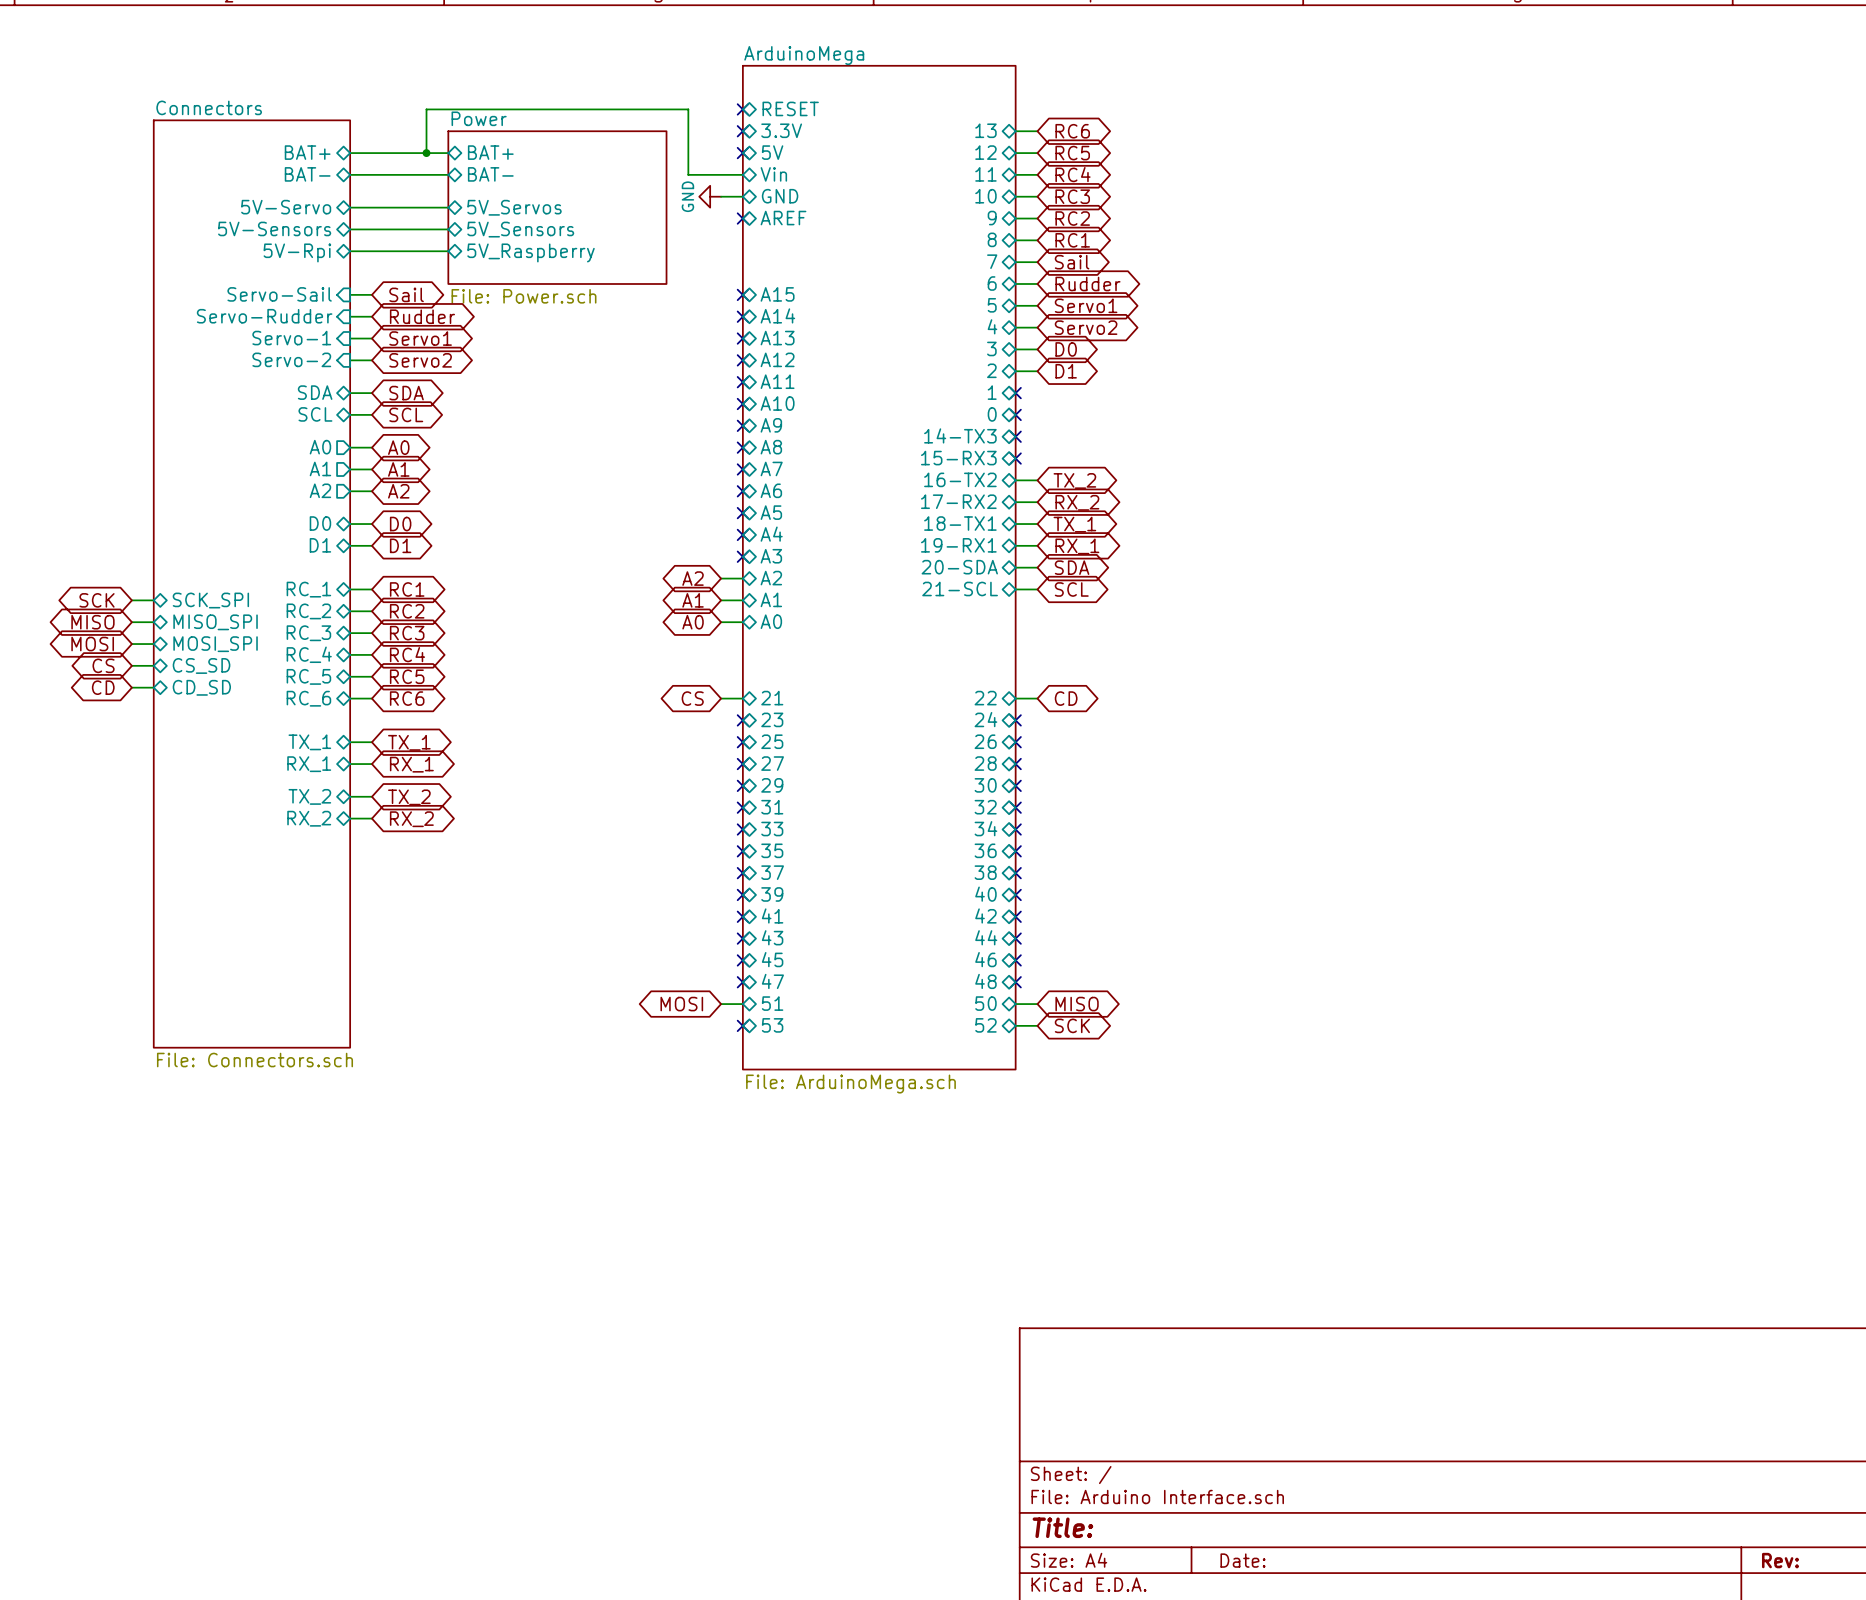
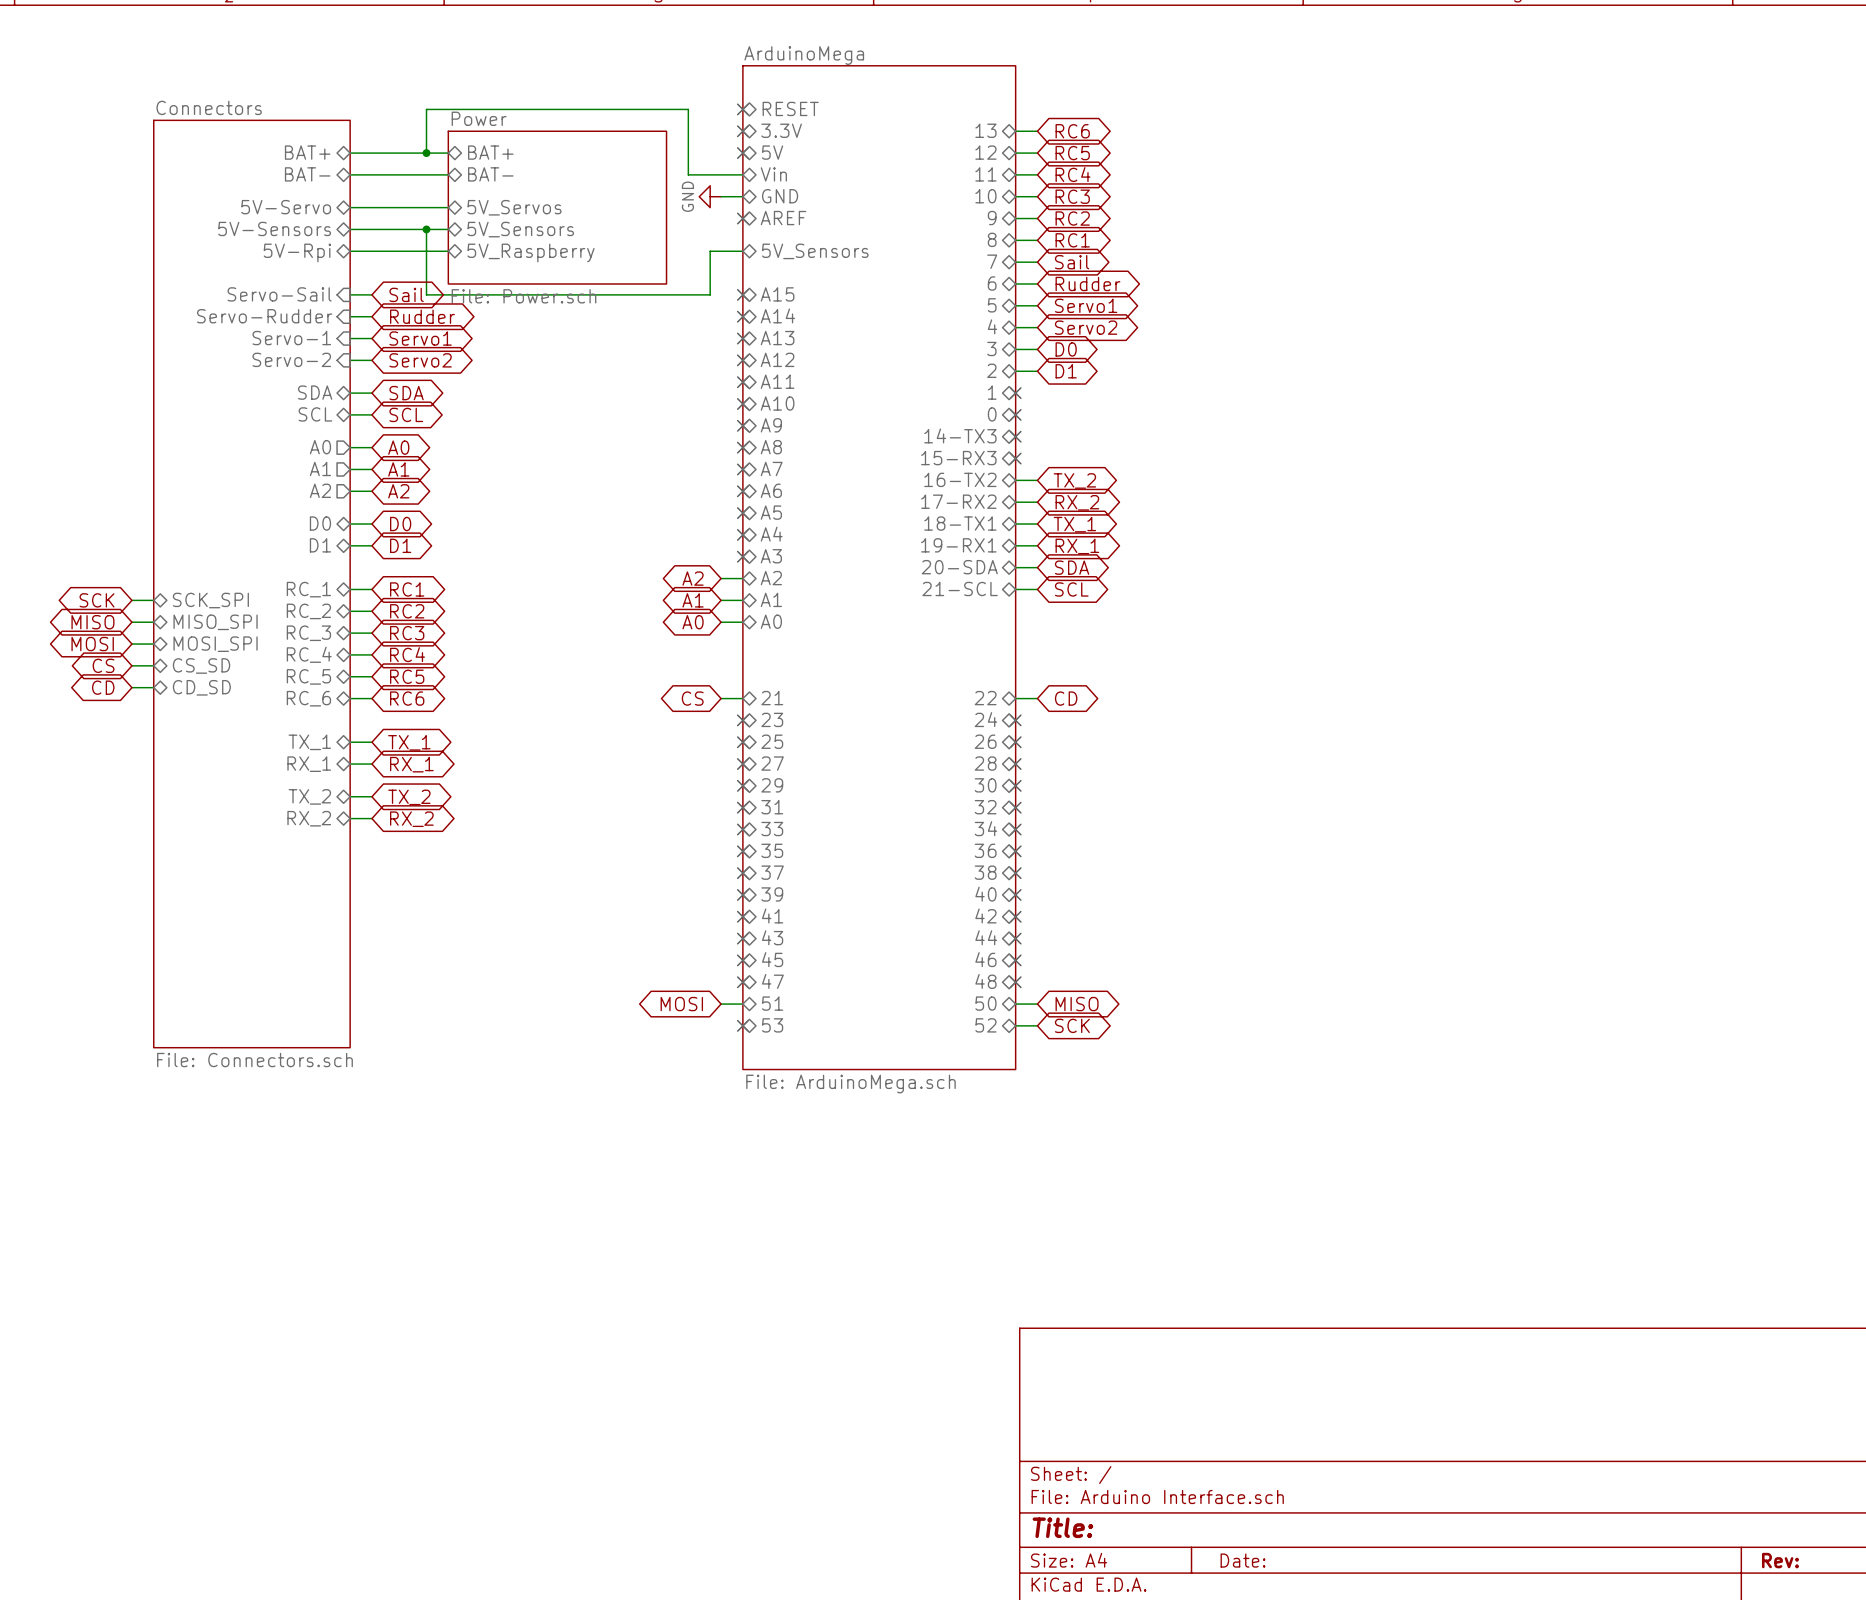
wire: none -> (426, 229) (426, 294) (710, 294) (710, 251) (742, 251)
junction: none -> (426, 229)
sheet pin: none -> 5V_Sensors (815, 251)

